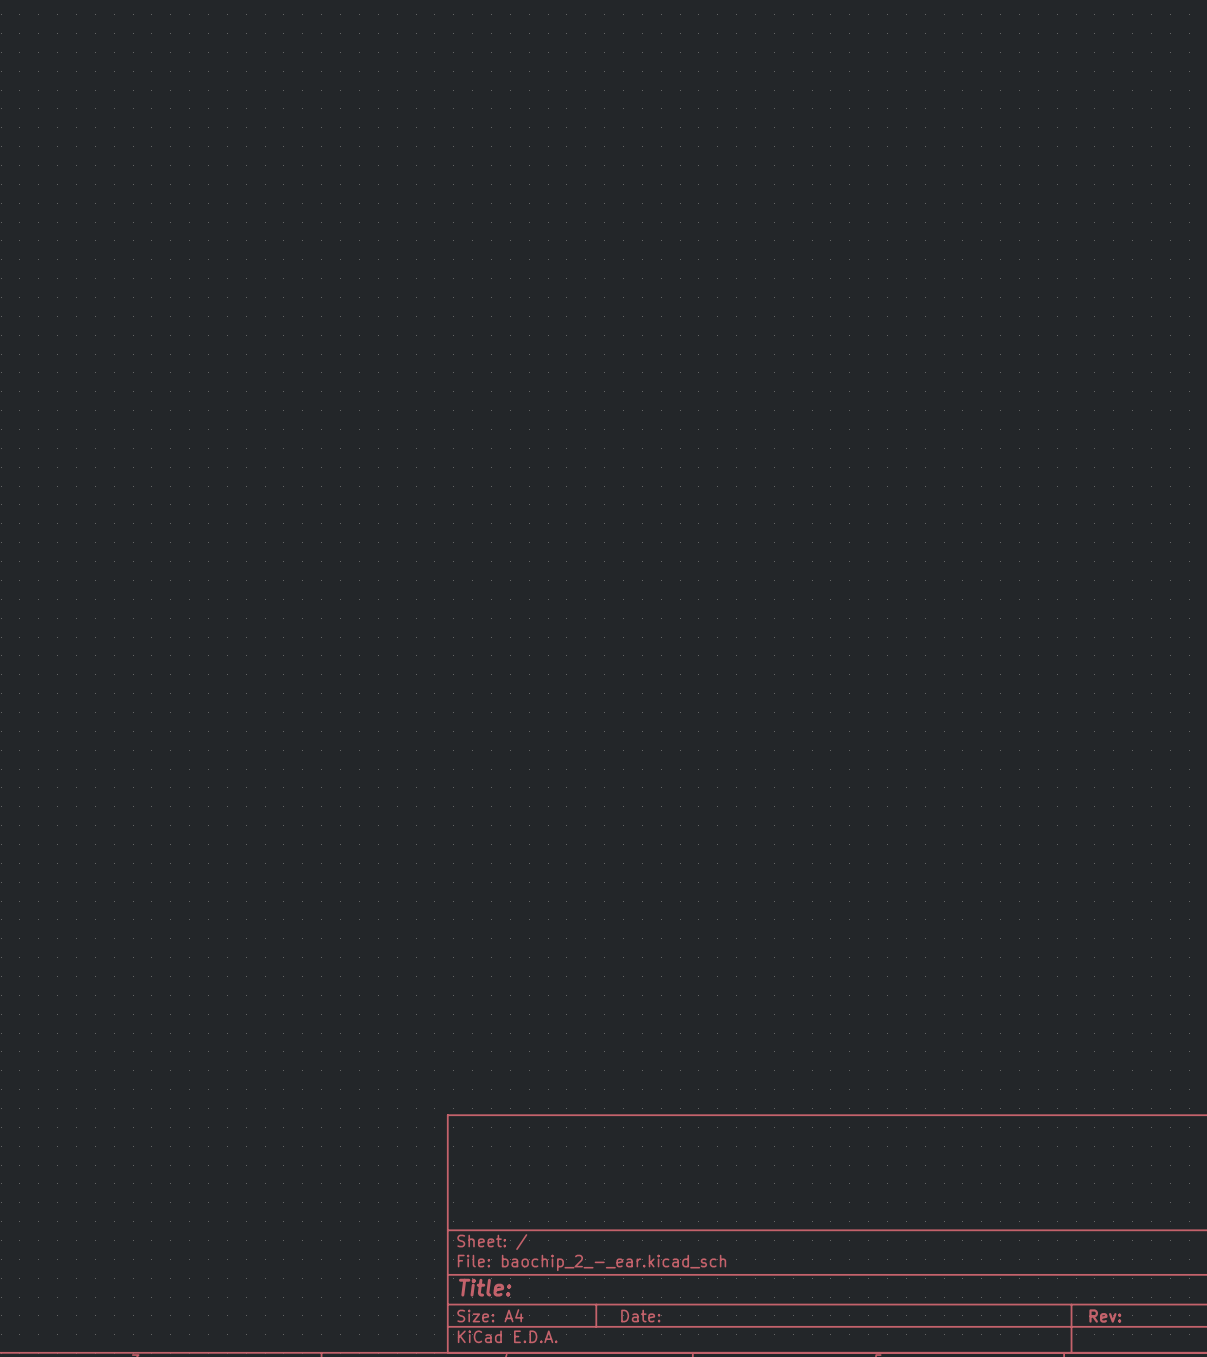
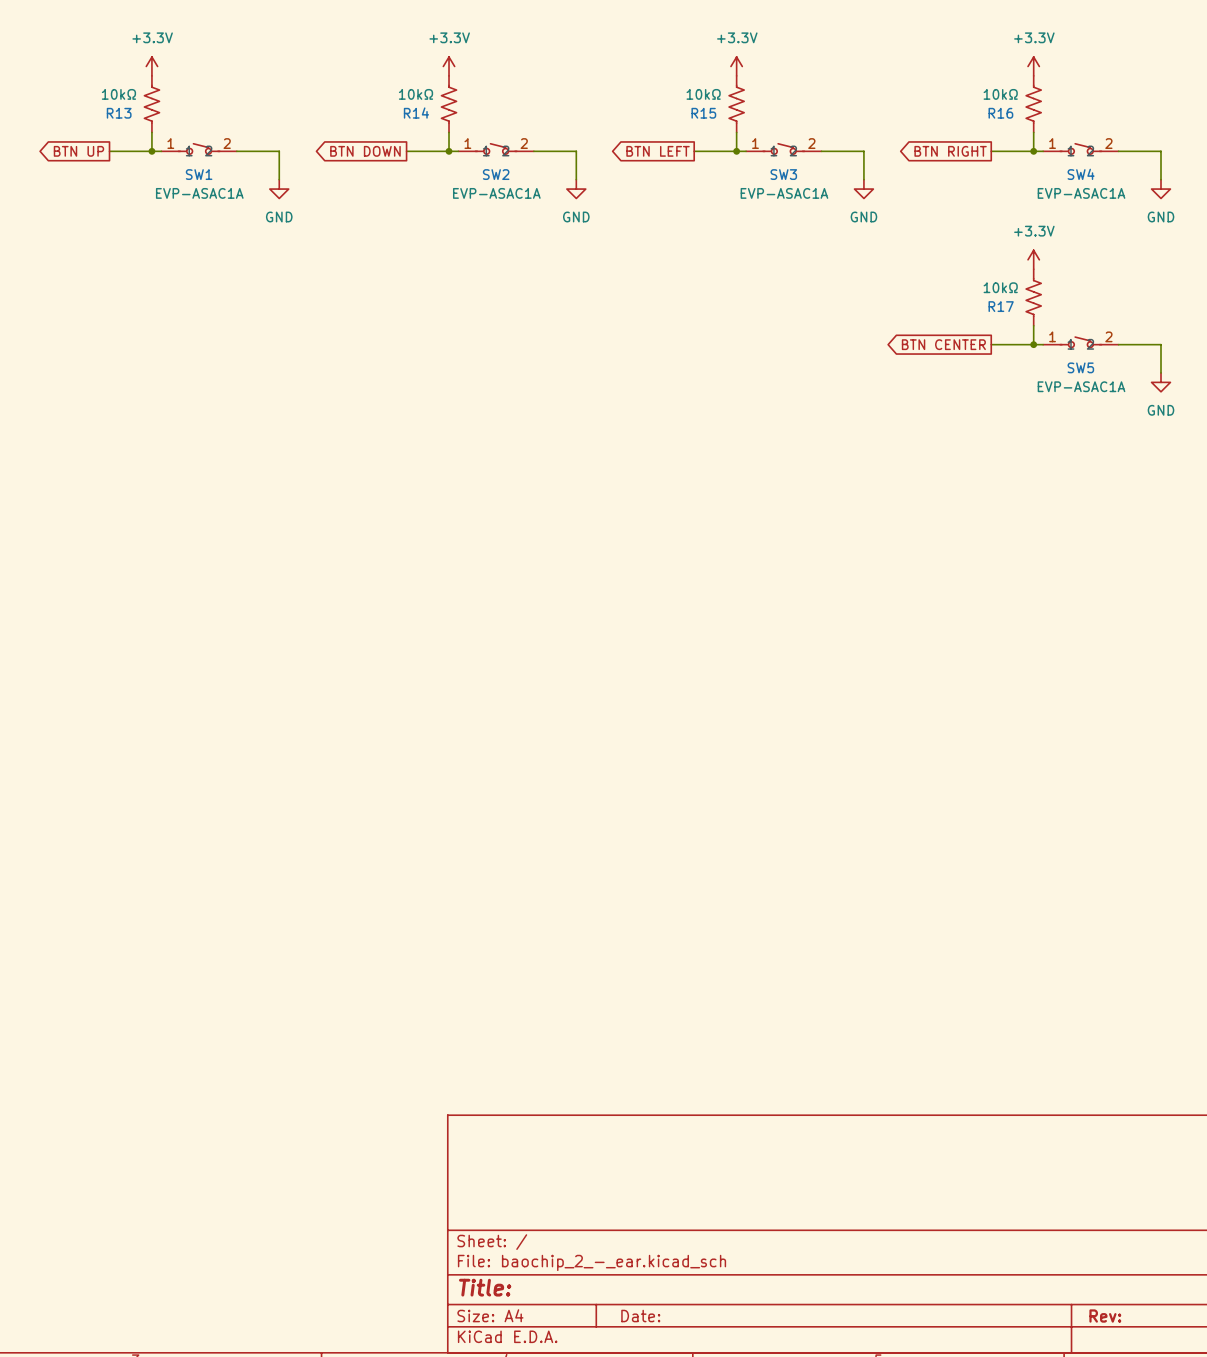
power symbol: none -> +3.3V (151, 66)
power symbol: none -> +3.3V (449, 66)
power symbol: none -> +3.3V (736, 66)
power symbol: none -> +3.3V (1033, 66)
R13: none -> 10kΩ (151, 104)
R14: none -> 10kΩ (449, 104)
R15: none -> 10kΩ (736, 104)
R16: none -> 10kΩ (1033, 104)
wire: none -> (151, 132) (151, 151)
wire: none -> (449, 132) (449, 151)
wire: none -> (736, 132) (736, 151)
wire: none -> (1033, 132) (1033, 151)
SW1: none -> EVP-ASAC1A (199, 148)
SW2: none -> EVP-ASAC1A (496, 148)
SW3: none -> EVP-ASAC1A (783, 148)
SW4: none -> EVP-ASAC1A (1080, 148)
global label: none -> BTN UP (78, 151)
wire: none -> (109, 151) (161, 151)
junction: none -> (151, 151)
wire: none -> (236, 151) (279, 151) (279, 179)
global label: none -> BTN DOWN (365, 151)
wire: none -> (406, 151) (458, 151)
junction: none -> (449, 151)
wire: none -> (533, 151) (576, 151) (576, 179)
global label: none -> BTN LEFT (658, 151)
wire: none -> (694, 151) (746, 151)
junction: none -> (736, 151)
wire: none -> (821, 151) (863, 151) (863, 179)
global label: none -> BTN RIGHT (950, 151)
wire: none -> (991, 151) (1043, 151)
junction: none -> (1033, 151)
wire: none -> (1118, 151) (1161, 151) (1161, 179)
power symbol: none -> GND (279, 189)
power symbol: none -> GND (576, 189)
power symbol: none -> GND (863, 189)
power symbol: none -> GND (1161, 189)
power symbol: none -> +3.3V (1033, 259)
R17: none -> 10kΩ (1033, 297)
wire: none -> (1033, 325) (1033, 344)
SW5: none -> EVP-ASAC1A (1080, 342)
global label: none -> BTN CENTER (943, 344)
wire: none -> (991, 344) (1043, 344)
junction: none -> (1033, 344)
wire: none -> (1118, 344) (1161, 344) (1161, 372)
power symbol: none -> GND (1161, 382)

